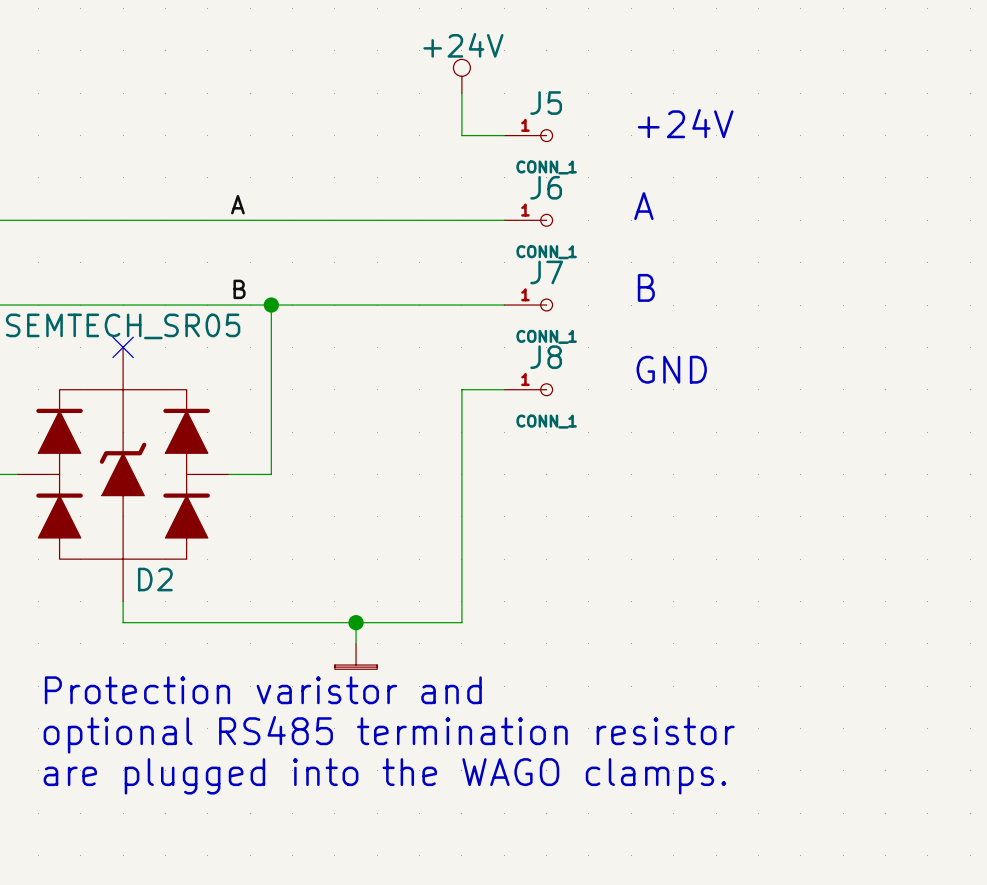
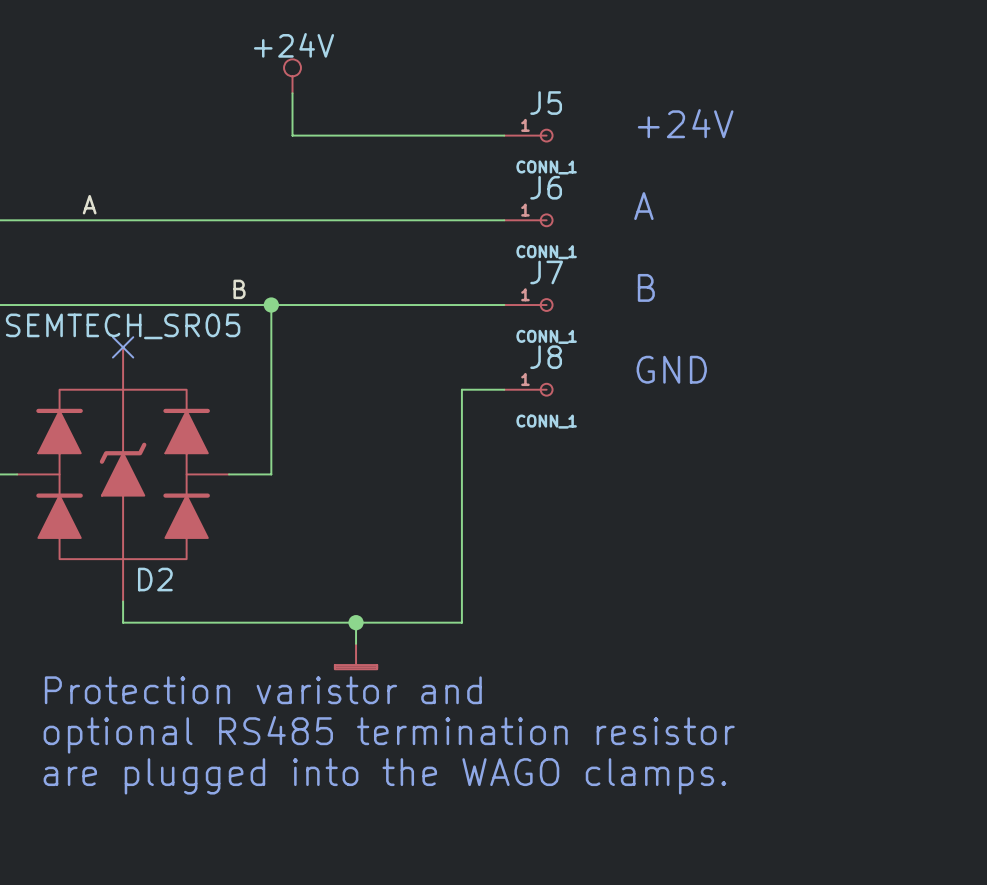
power symbol position: +24V (461, 76) -> +24V (292, 76)
wire: (461, 93) (461, 135) -> (292, 93) (292, 135) (461, 135)
label position: A (237, 204) -> A (89, 204)

